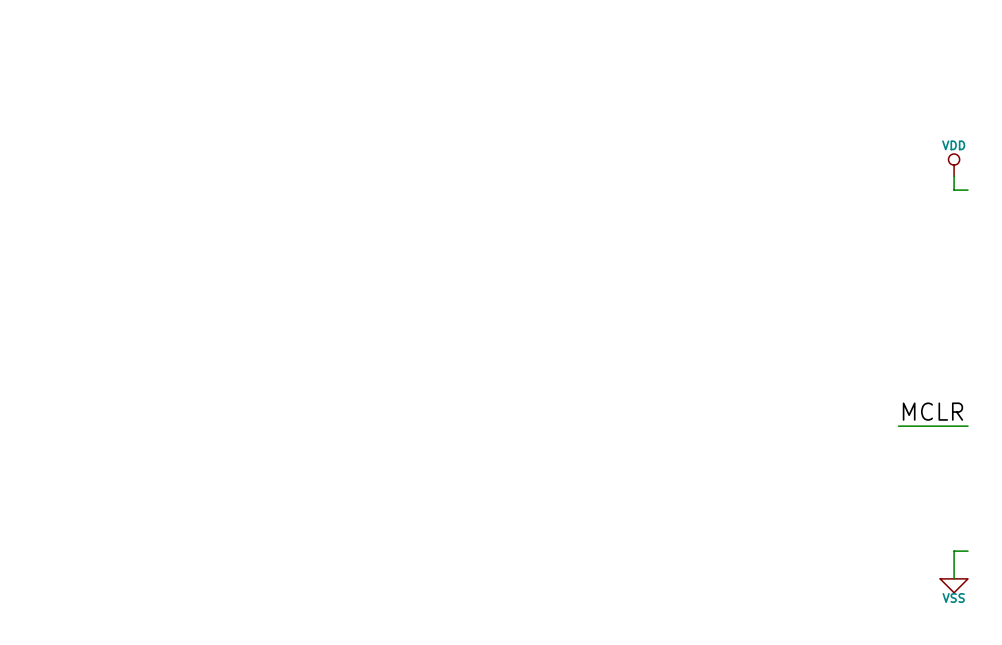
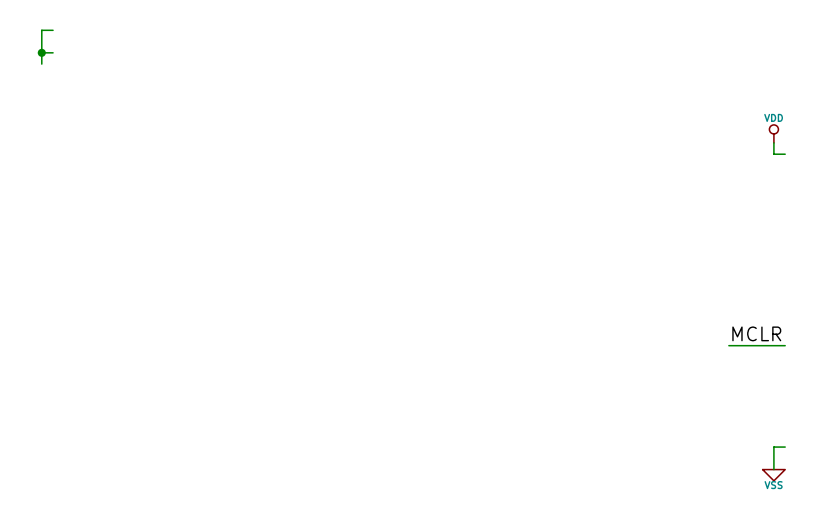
wire: none -> (53, 30) (41, 30) (41, 64)
wire: none -> (41, 52) (53, 52)
junction: none -> (41, 52)

